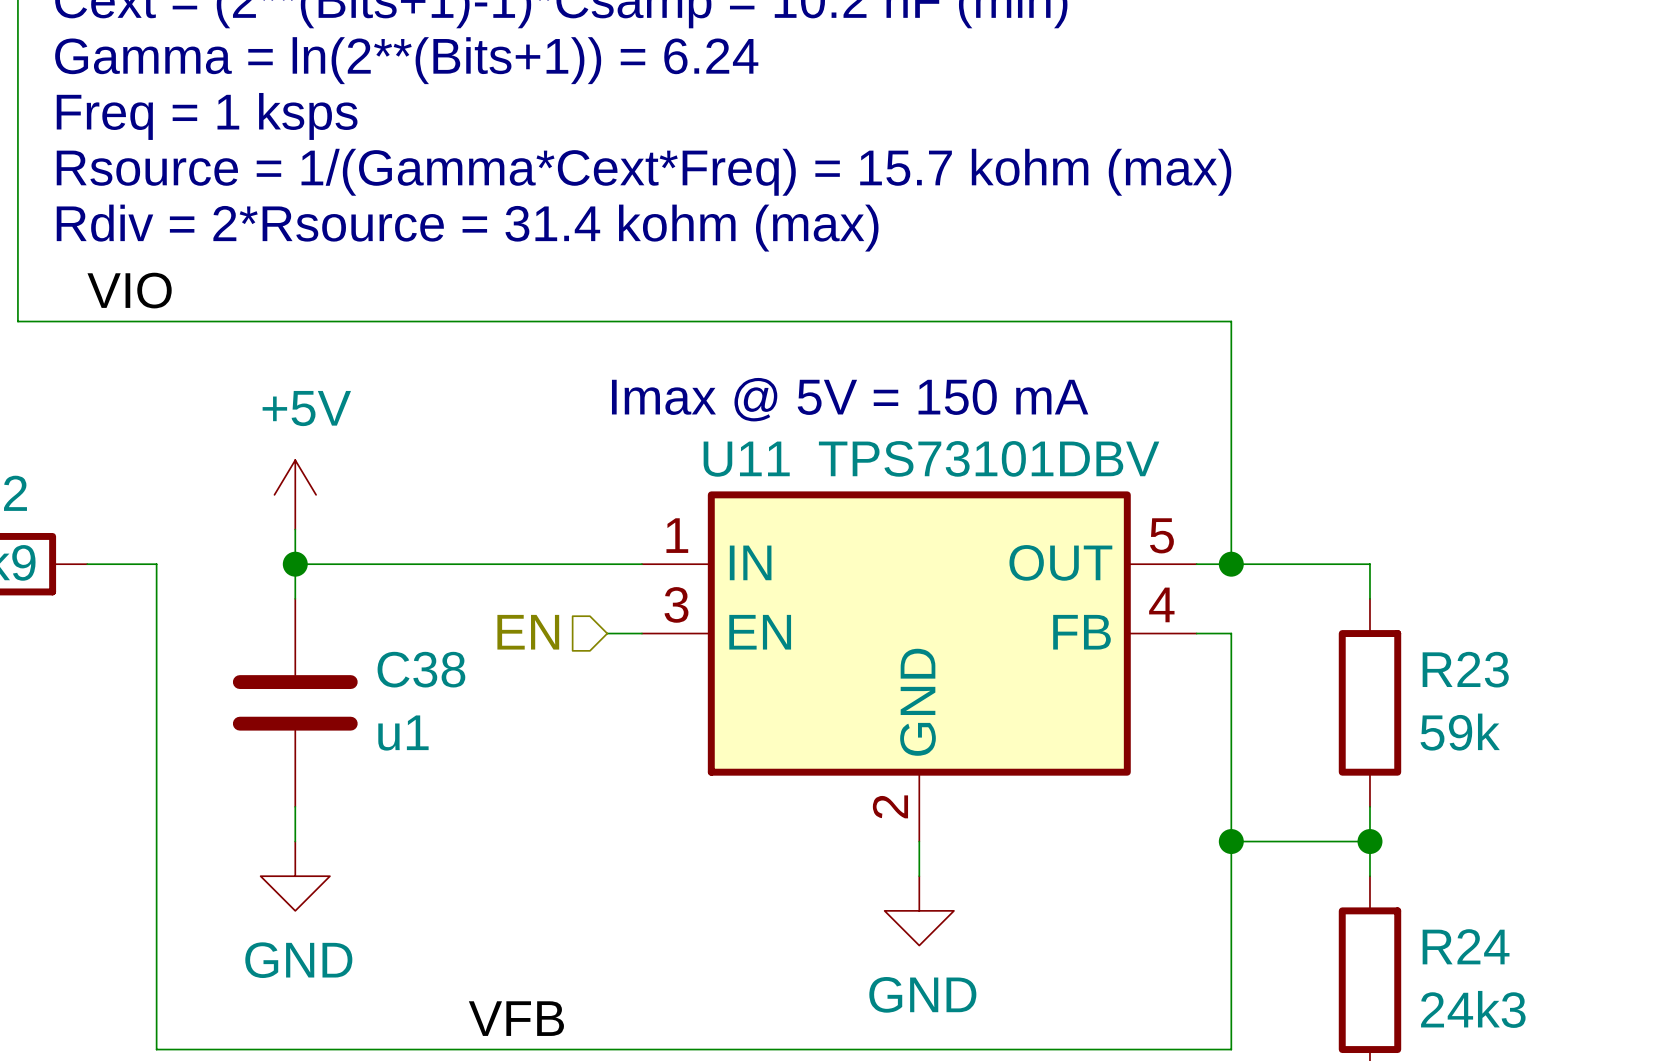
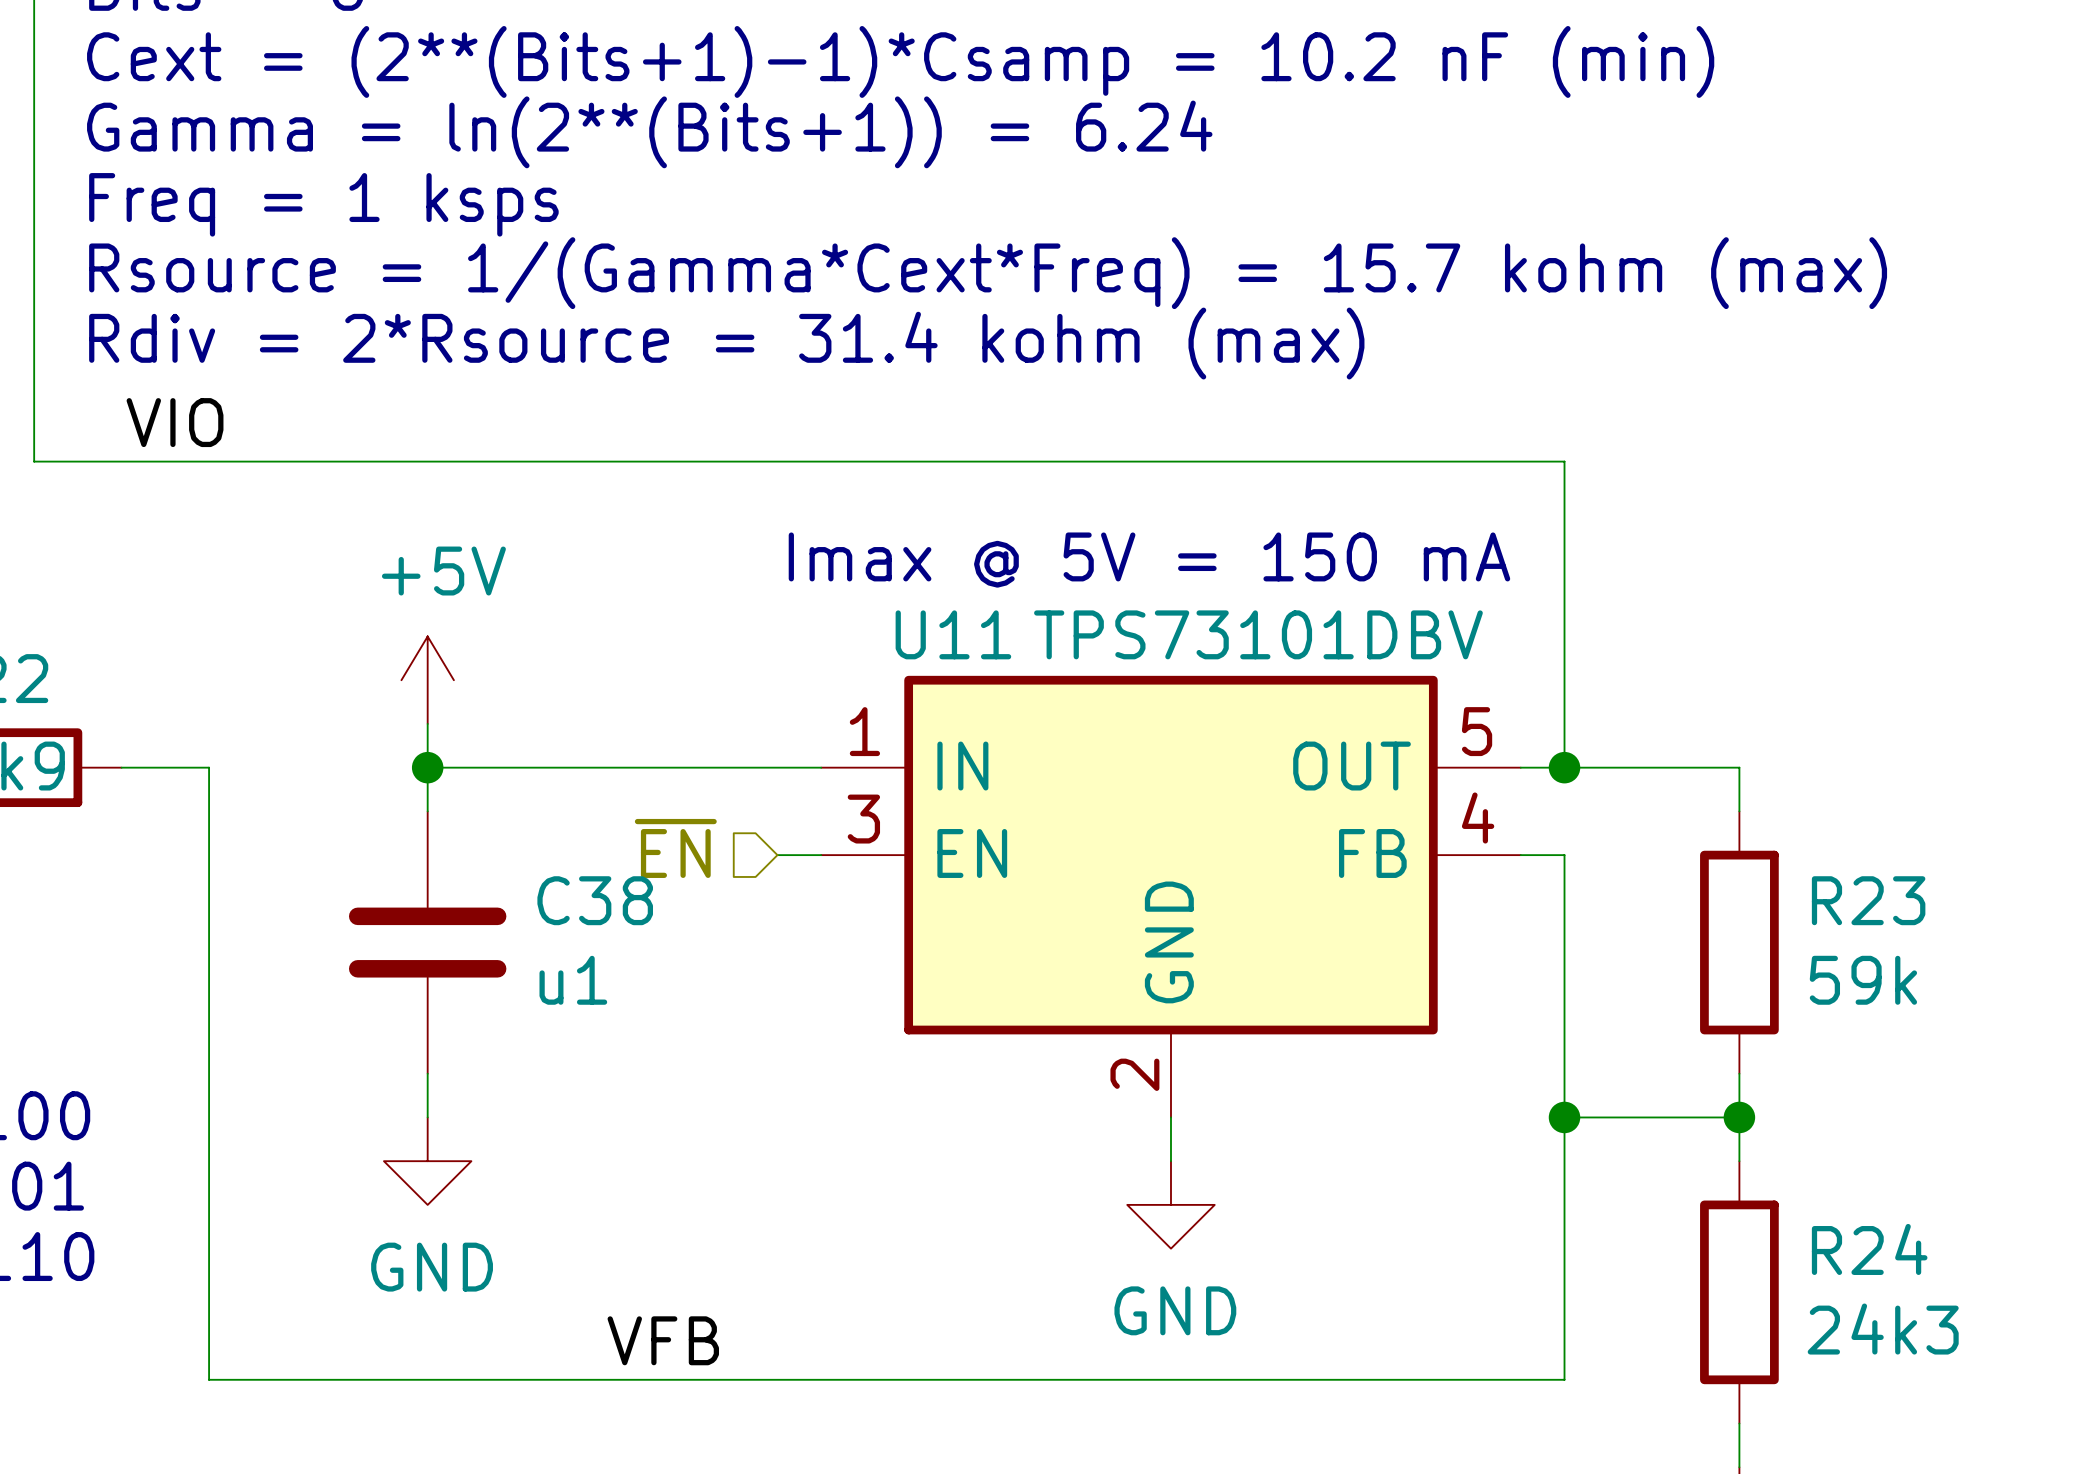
power symbol position: +5V (295, 494) -> +5V (427, 680)
wire: (295, 529) (295, 598) -> (427, 723) (427, 811)
wire: (295, 564) (329, 564) -> none
junction position: (295, 564) -> (427, 767)
hierarchical label: EN (528, 632) -> ~{EN} (675, 848)
C38 position: (295, 702) -> (427, 942)
wire: (295, 806) (295, 841) -> (427, 1073) (427, 1117)
power symbol position: GND (295, 876) -> GND (427, 1161)

